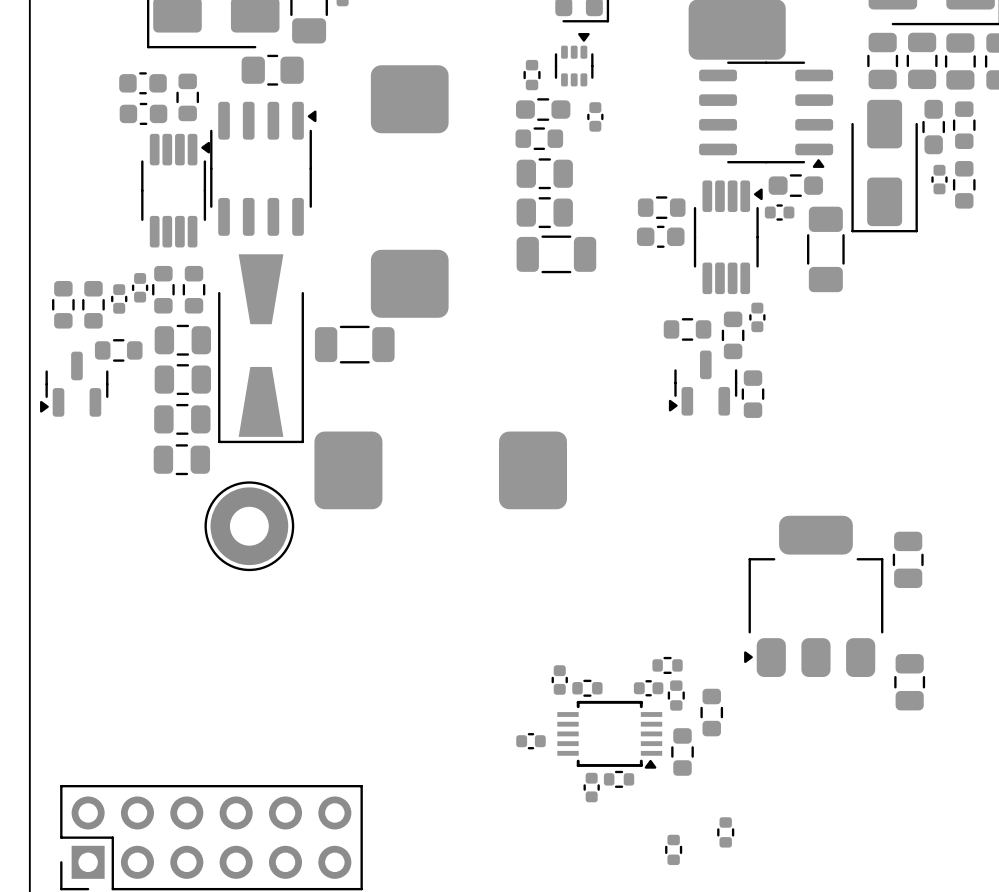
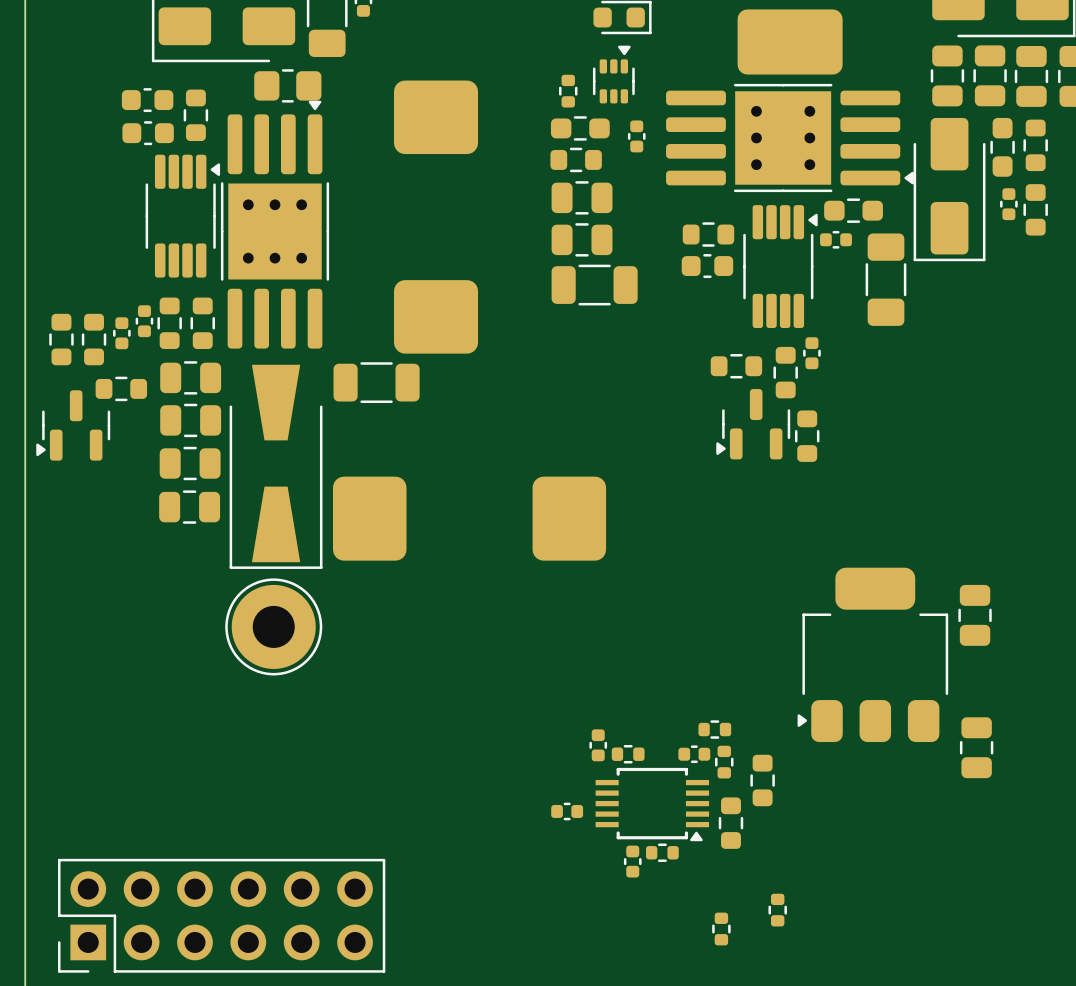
part: (766, 114) -> none
part: none -> (789, 137)
part: (263, 168) -> none
part: none -> (275, 224)
part position: (261, 348) -> (276, 466)
part position: (249, 526) -> (273, 626)

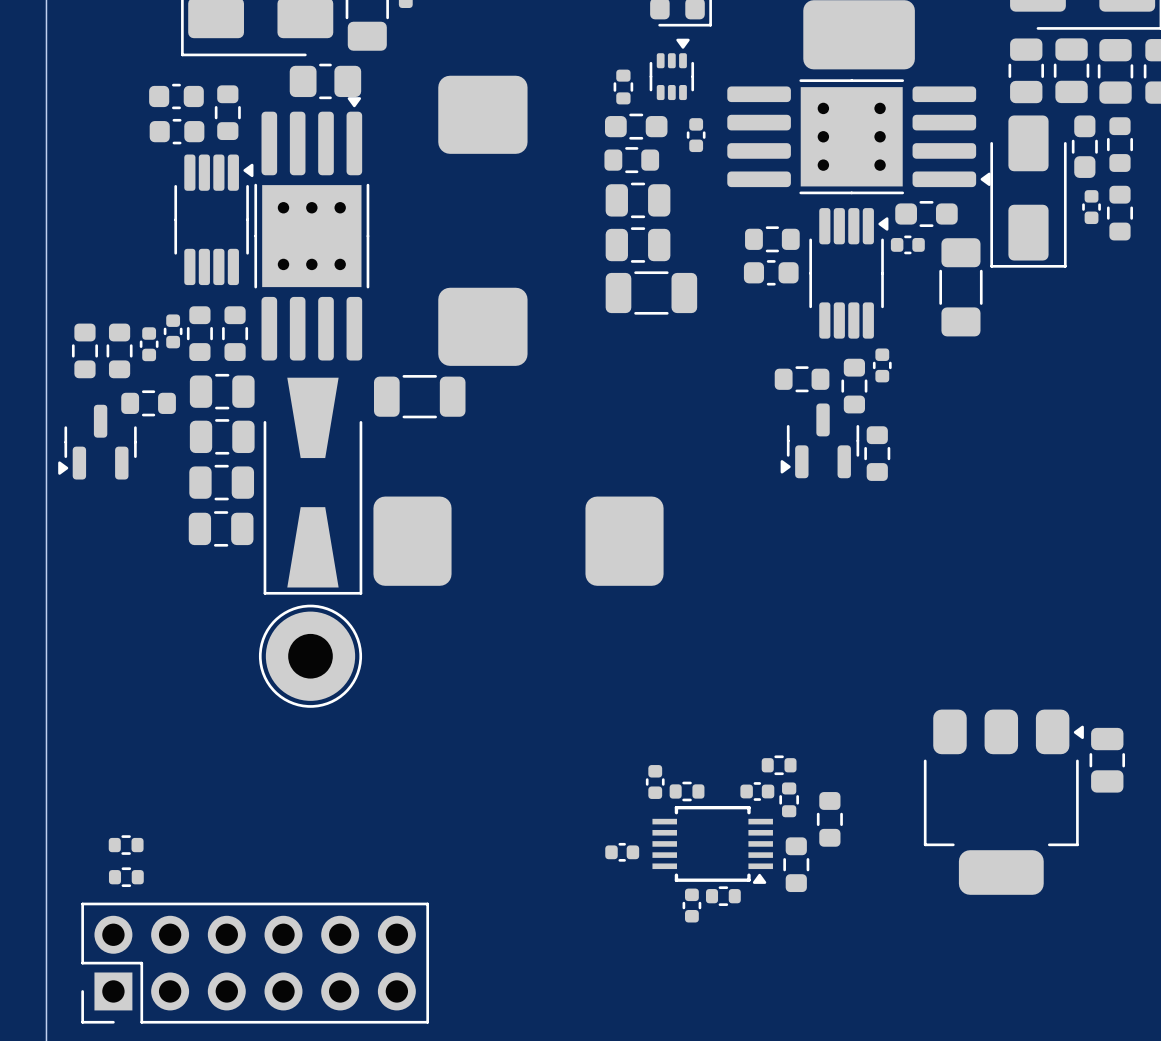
part: (975, 615) -> none
part rotation: 0° (872, 654) -> 180° (1003, 802)
part position: (872, 654) -> (1003, 802)
part position: (976, 747) -> (1107, 760)
part: none -> (126, 845)
part: none -> (126, 877)
part: (777, 910) -> none
part: (721, 929) -> none

